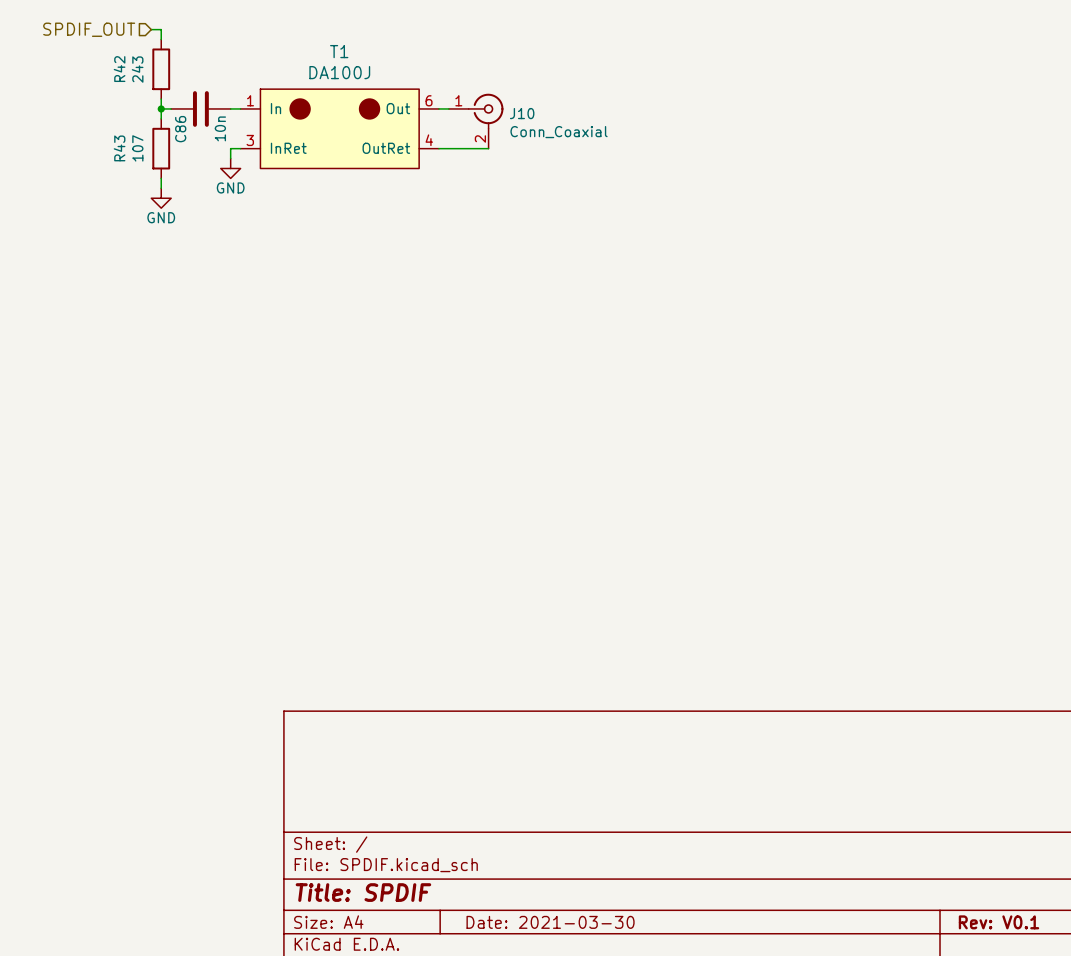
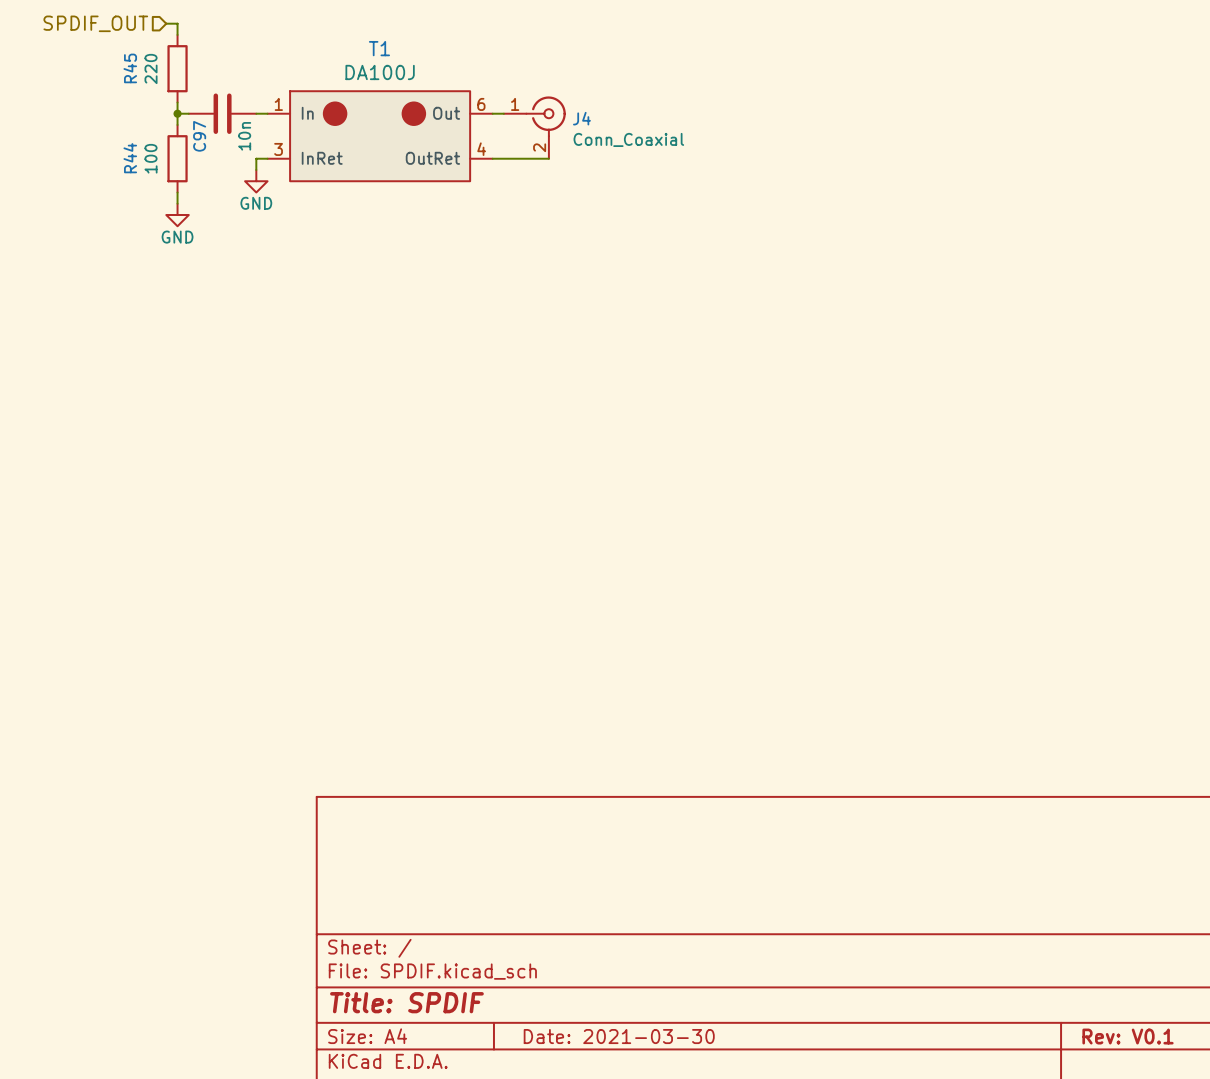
R42 name: R42 (119, 69) -> R45 (130, 68)
R42 value: 243 (137, 69) -> 220 (151, 68)
J10 name: J10 (522, 113) -> J4 (581, 118)
C86 name: C86 (180, 129) -> C97 (199, 136)
R43 name: R43 (119, 148) -> R44 (130, 158)
R43 value: 107 (137, 148) -> 100 (151, 158)

